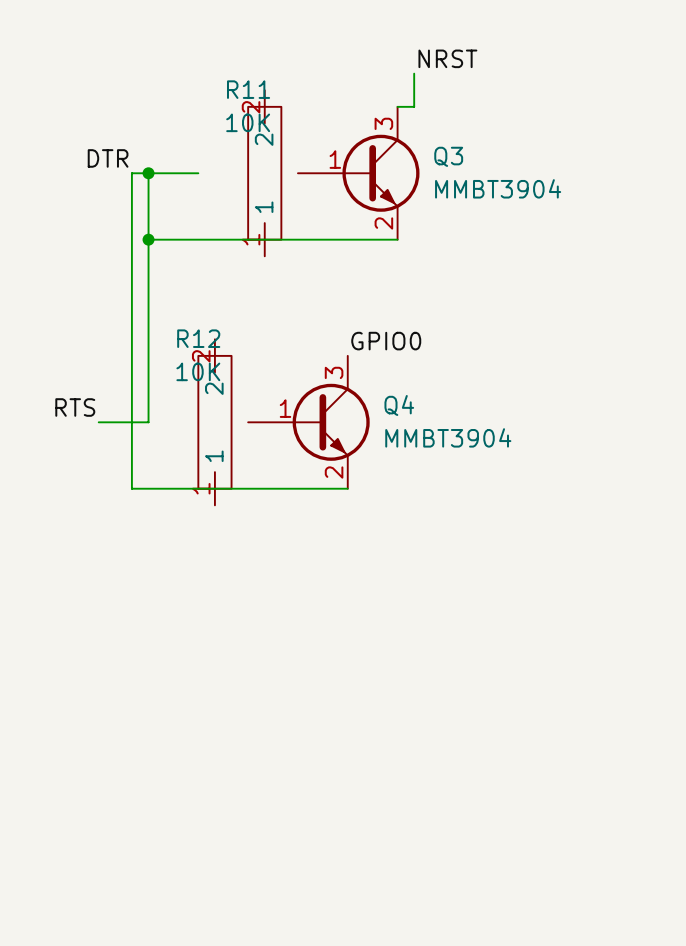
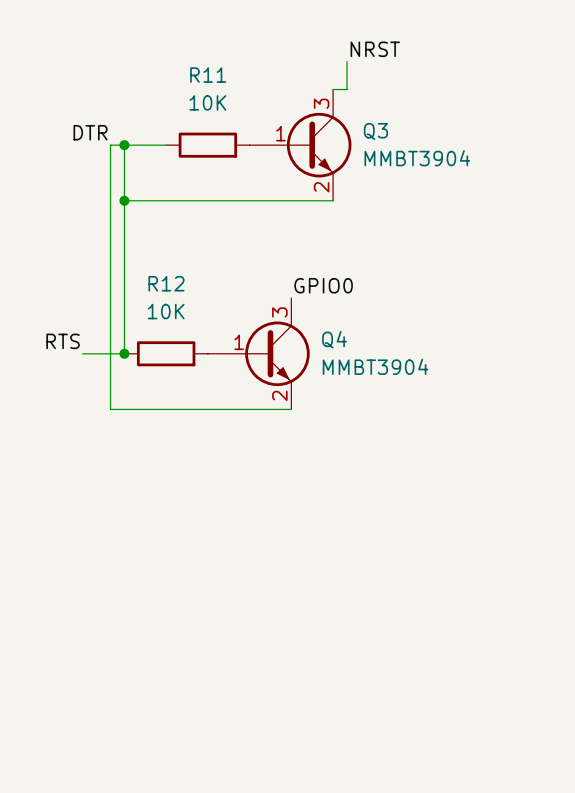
R11 symbol: [248, 90, 282, 257] -> [166, 132, 250, 158]
R12 symbol: [198, 339, 232, 506] -> [124, 341, 208, 367]
junction: none -> (124, 353)

